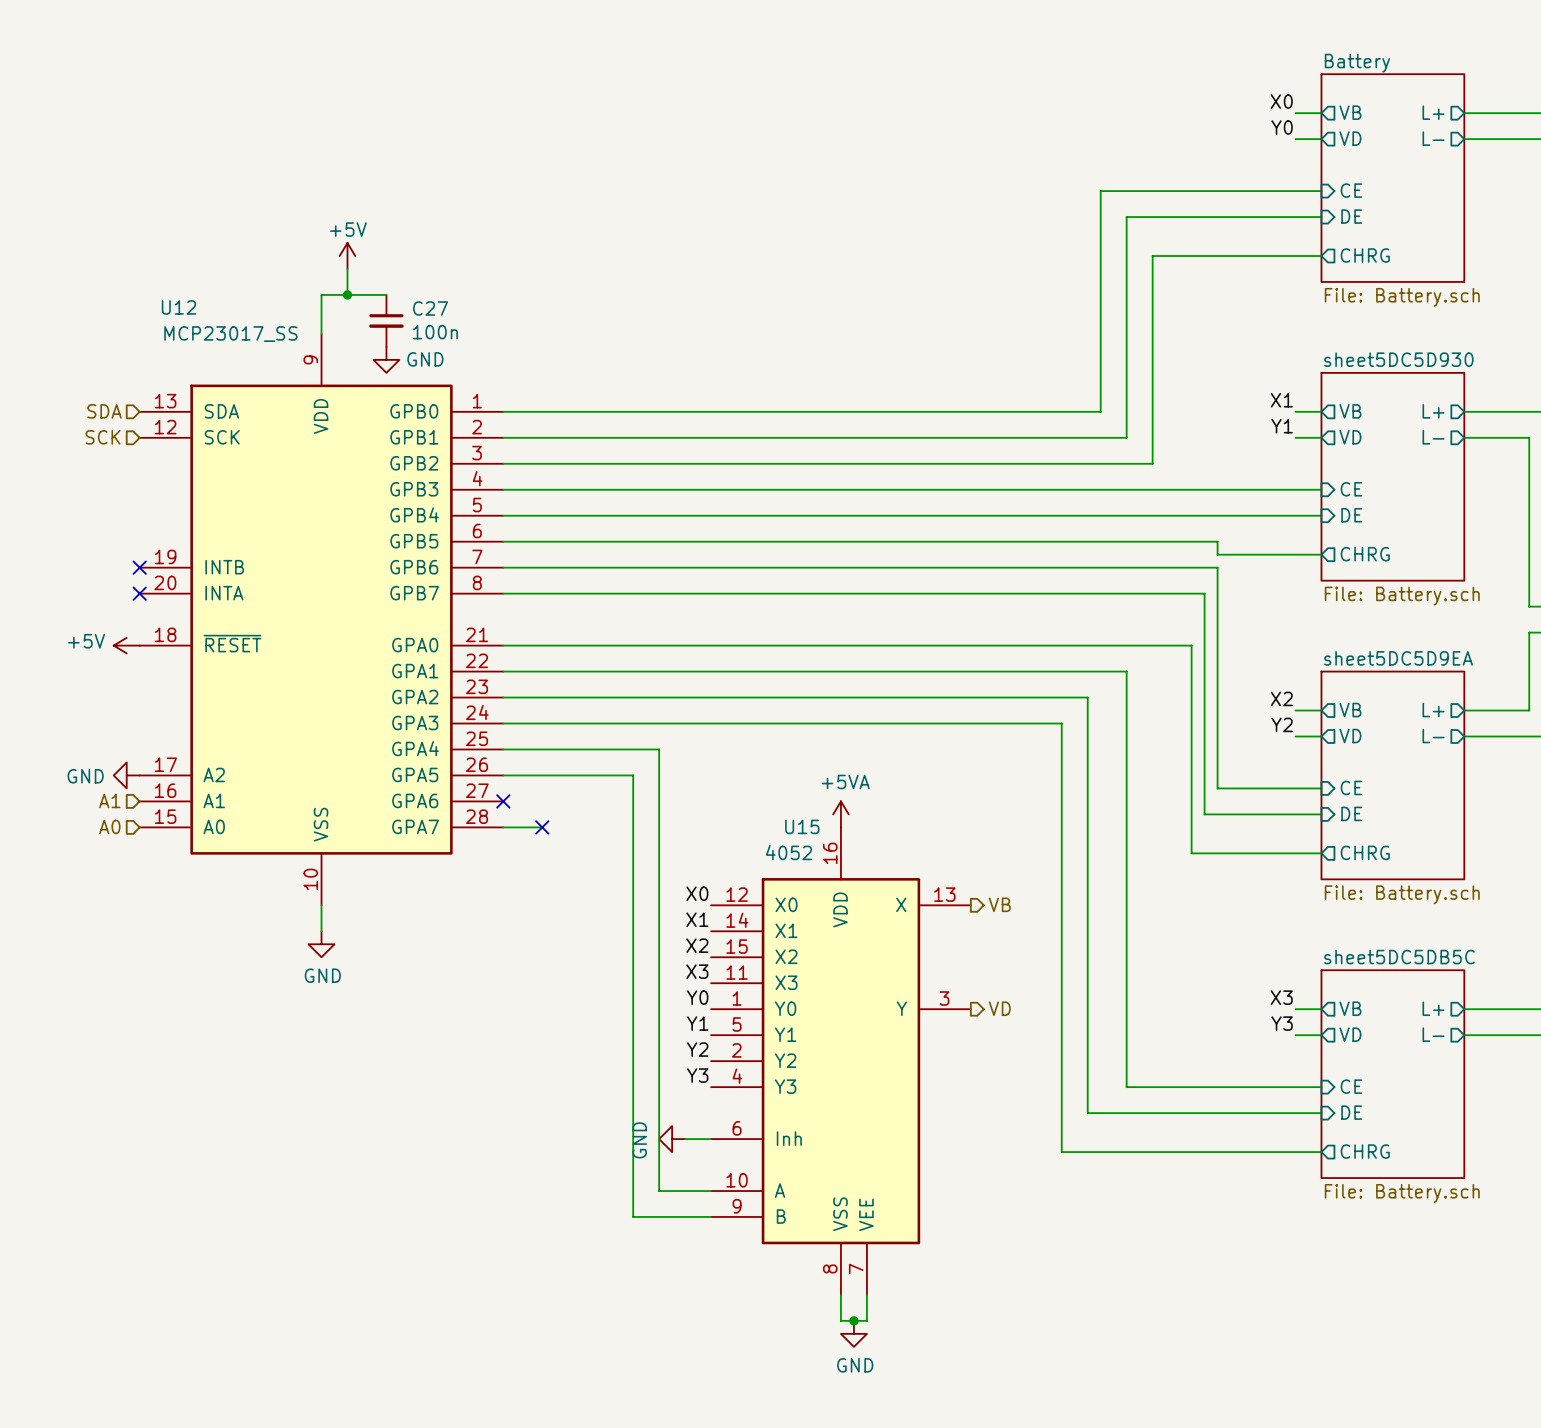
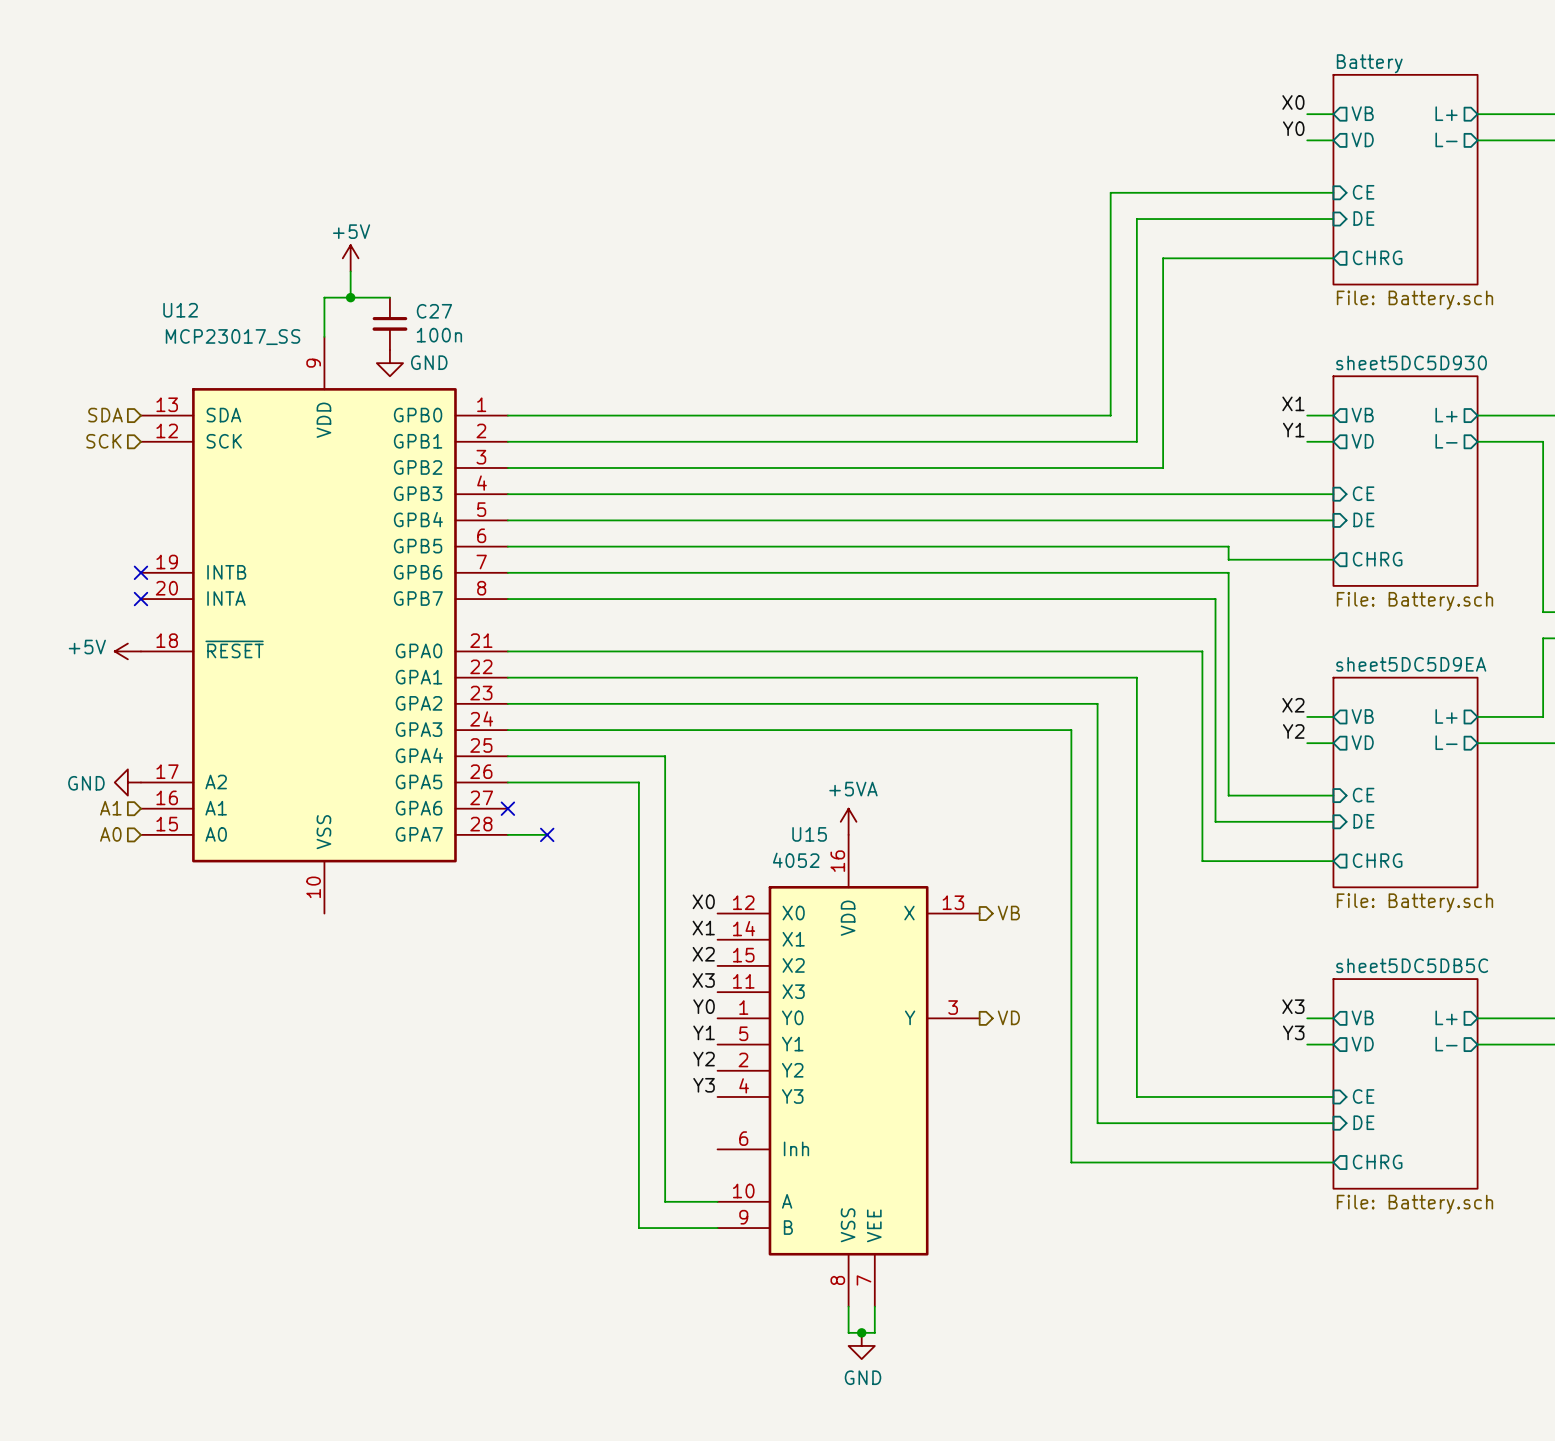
wire: (321, 905) (321, 931) -> none
power symbol: GND (321, 944) -> none
power symbol: GND (672, 1139) -> none
wire: (685, 1139) (711, 1139) -> none

